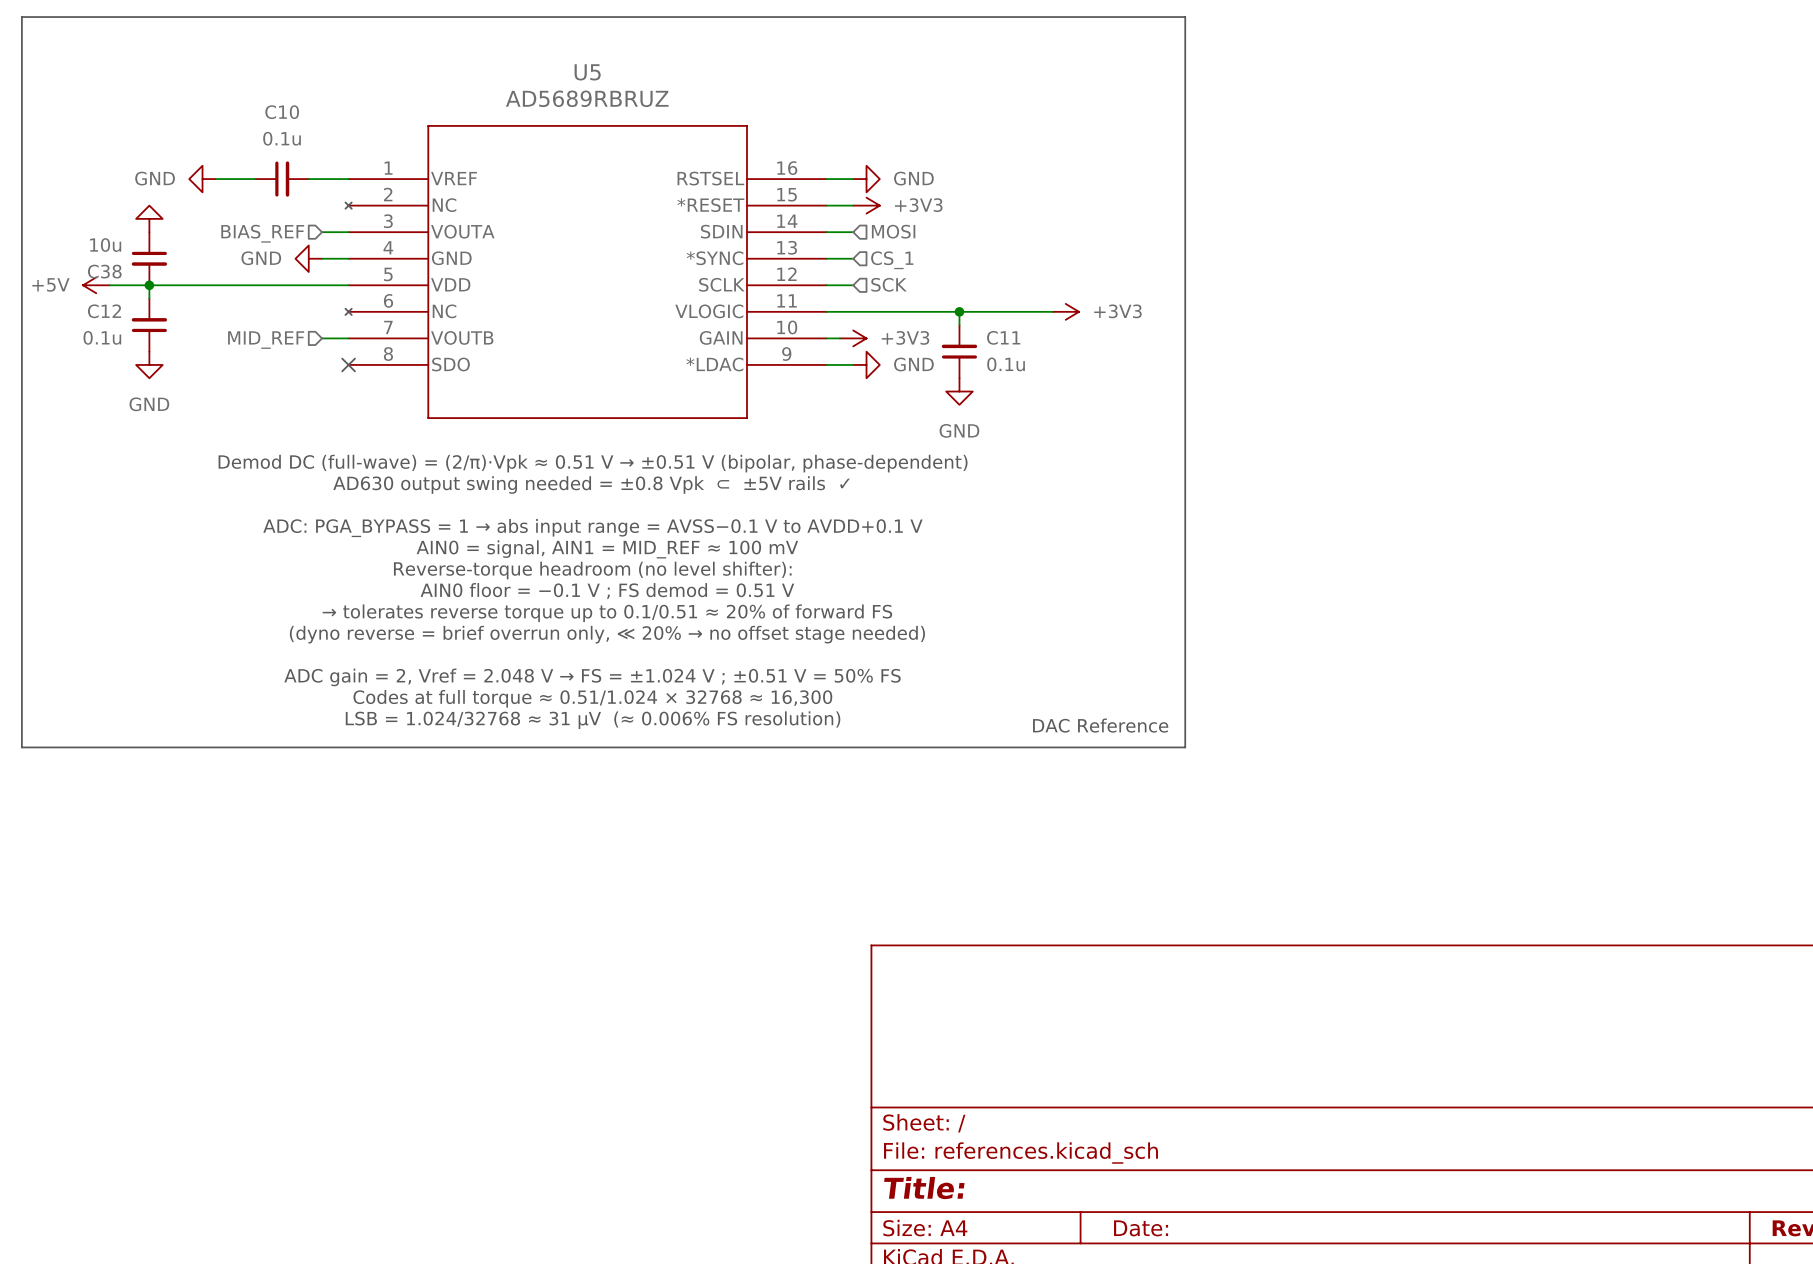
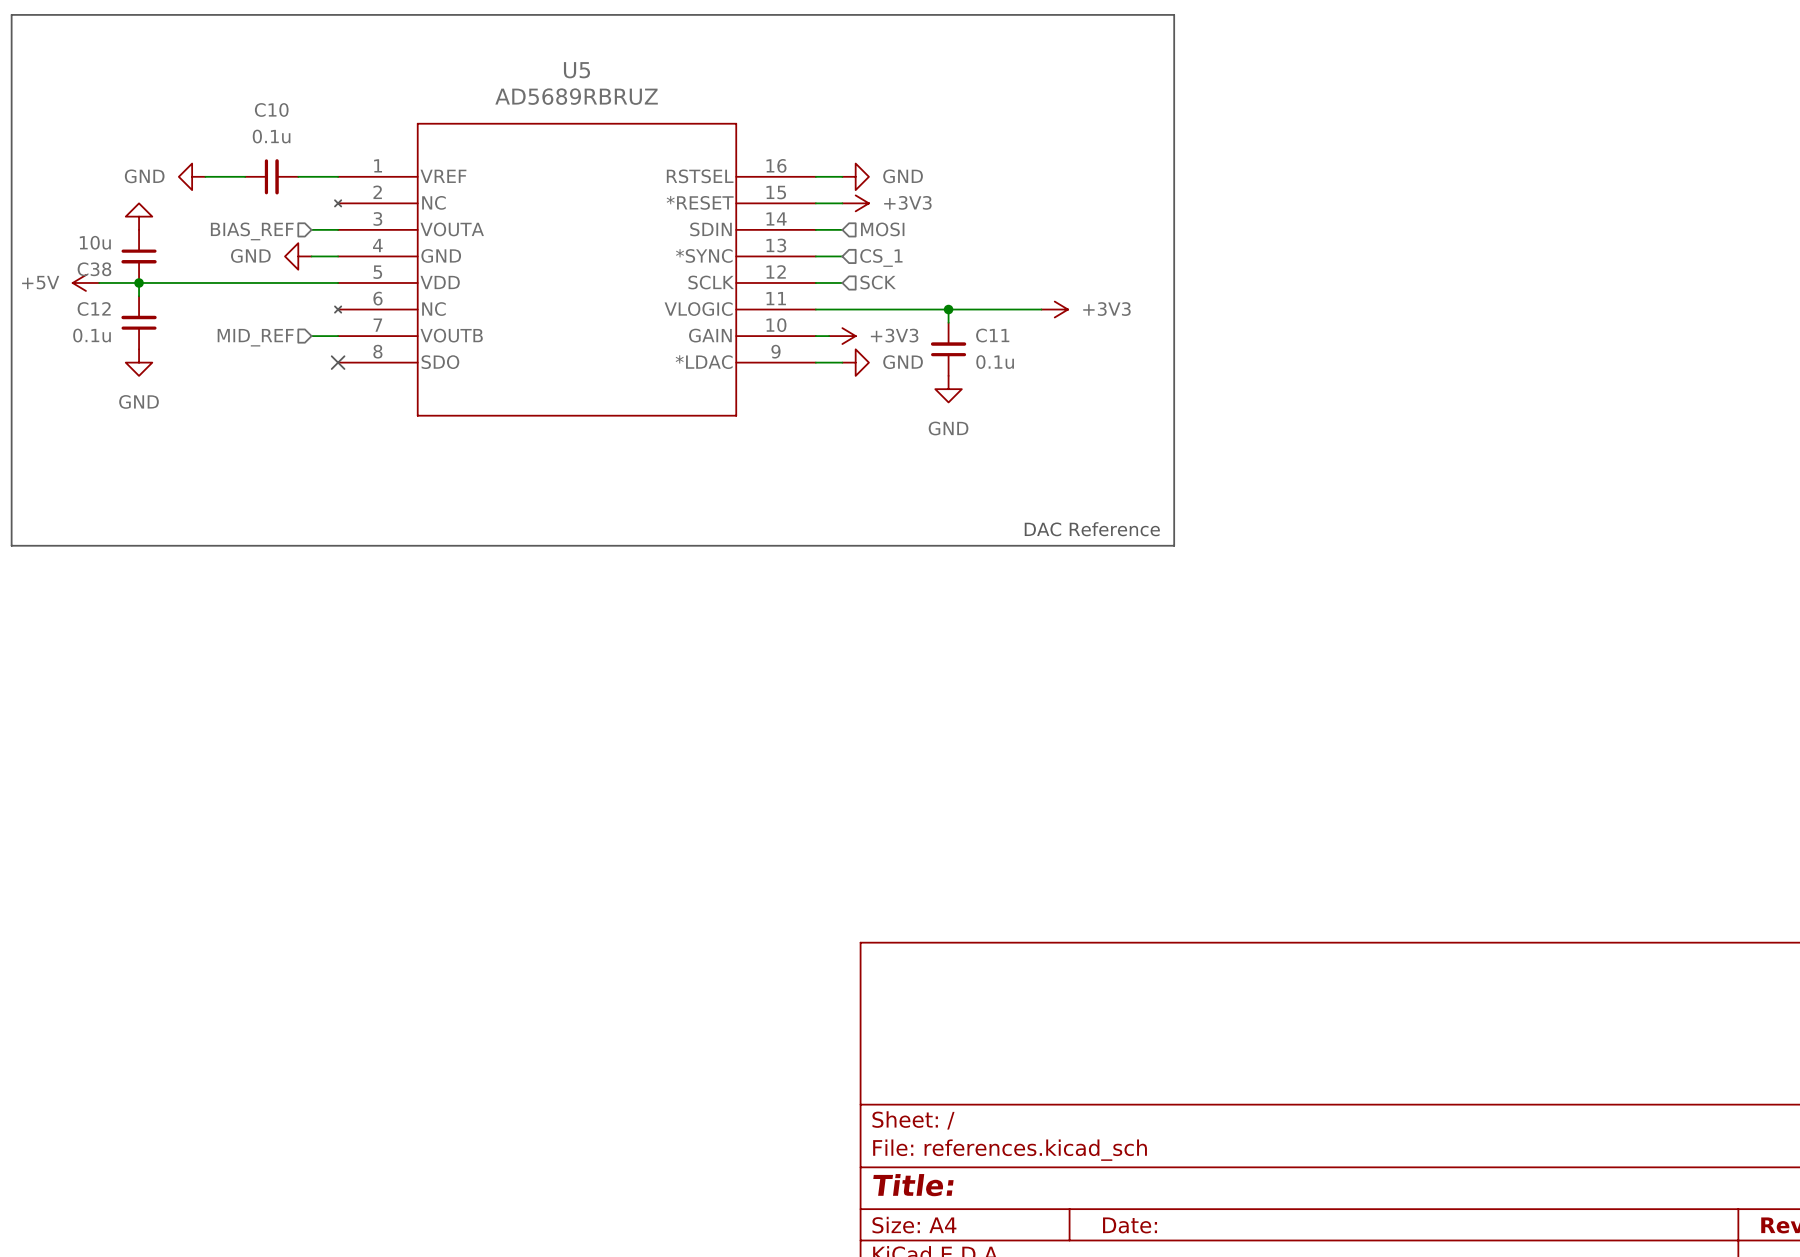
text: Demod DC (full-wave) = (2/π)·Vpk ≈ 0.51 V → ±0.51 V (bipolar, phase-dependent) (593, 463) -> none
text: AD630 output swing needed = ±0.8 Vpk ⊂ ±5V rails ✓ (591, 484) -> none
text: ADC: PGA_BYPASS = 1 → abs input range = AVSS−0.1 V to AVDD+0.1 V (592, 528) -> none
line: (21, 548) (21, 747) (1185, 747) (1185, 548) -> (11, 545) (1174, 545)
text: AIN0 = signal, AIN1 = MID_REF ≈ 100 mV (607, 549) -> none
text: Reverse-torque headroom (no level shifter): (592, 570) -> none
text: AIN0 floor = −0.1 V ; FS demod = 0.51 V (607, 591) -> none
text: → tolerates reverse torque up to 0.1/0.51 ≈ 20% of forward FS (607, 613) -> none
text: (dyno reverse = brief overrun only, ≪ 20% → no offset stage needed) (607, 634) -> none
text: ADC gain = 2, Vref = 2.048 V → FS = ±1.024 V ; ±0.51 V = 50% FS (592, 677) -> none
text: Codes at full torque ≈ 0.51/1.024 × 32768 ≈ 16,300 (592, 698) -> none
text: LSB = 1.024/32768 ≈ 31 µV (≈ 0.006% FS resolution) (593, 720) -> none
text position: DAC Reference (1100, 725) -> DAC Reference (1092, 529)

